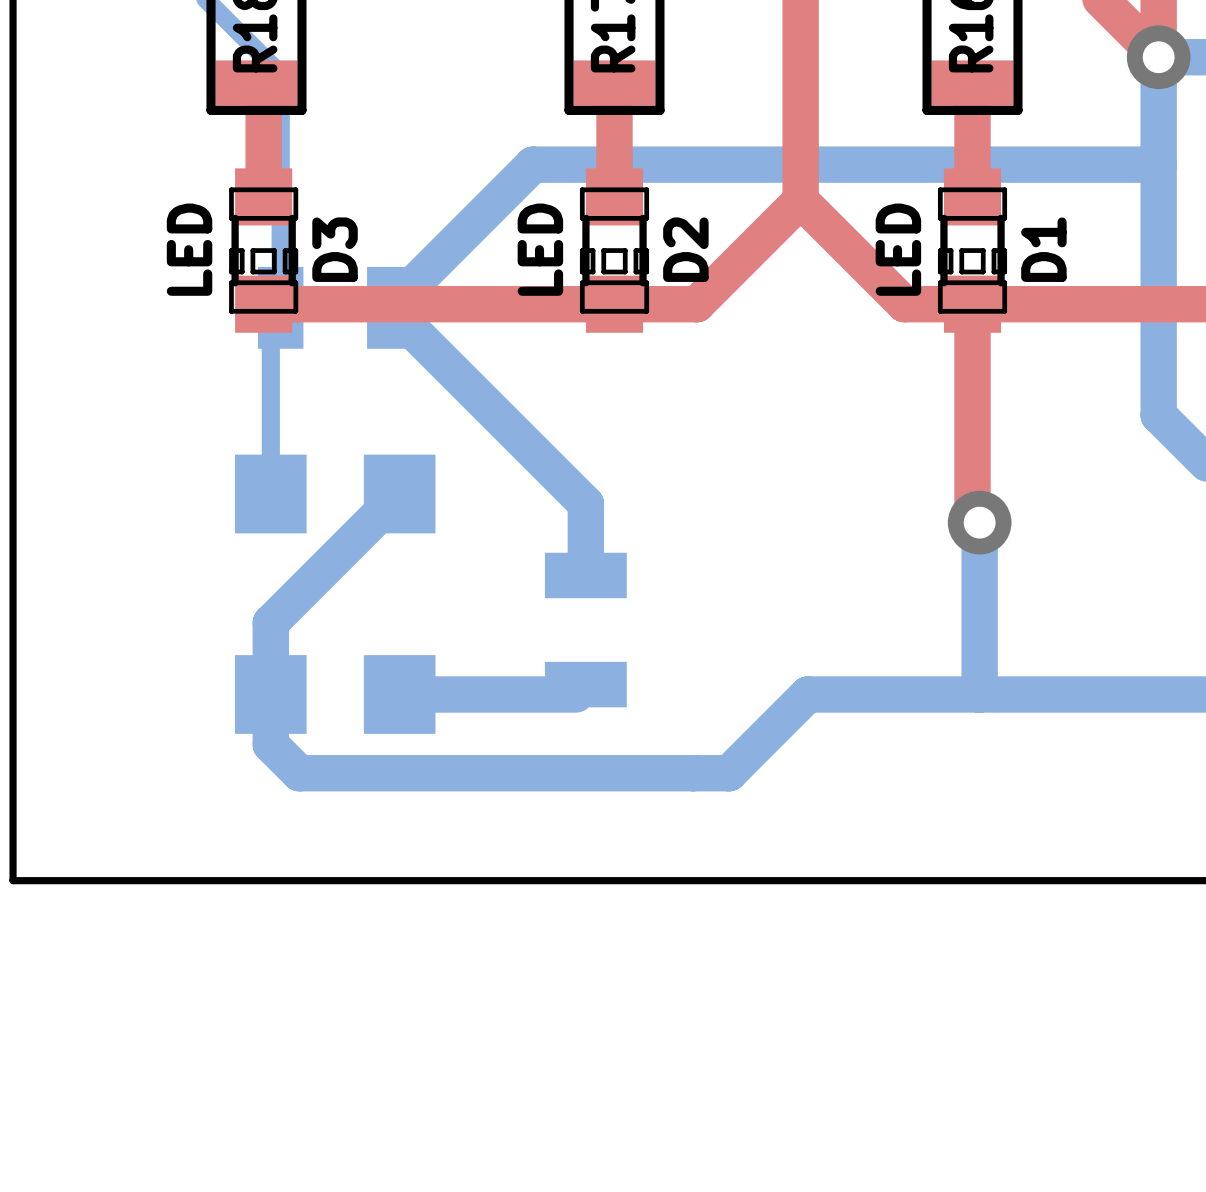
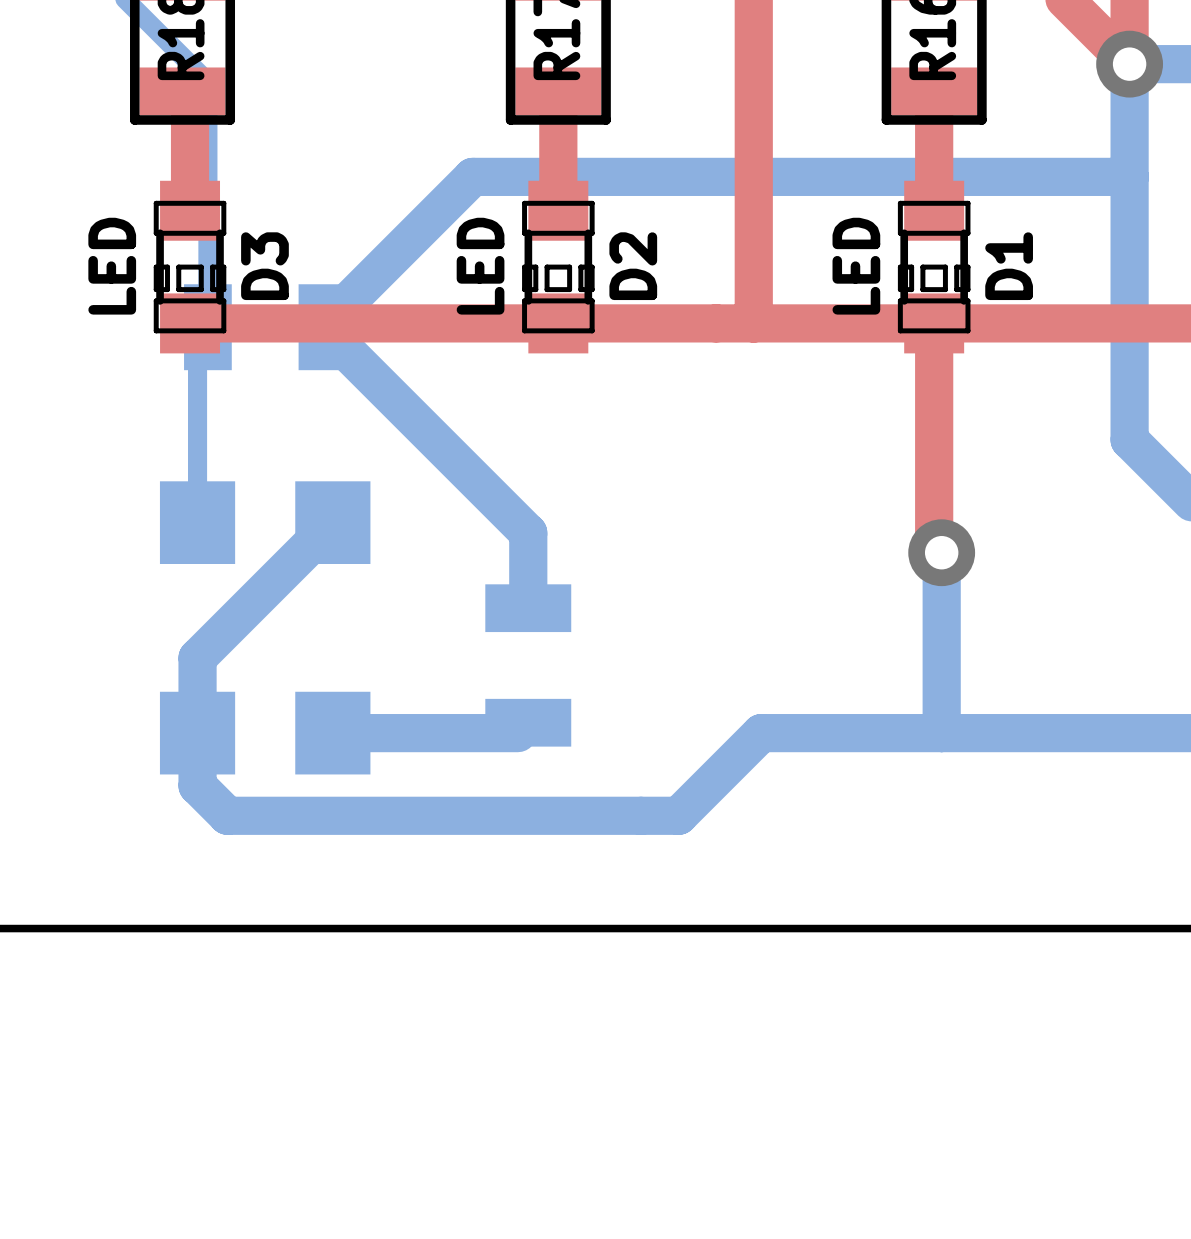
top track: none -> (753, 214) (753, 323)
top track: (696, 304) (800, 200) (904, 304) -> (644, 323) (862, 323)

